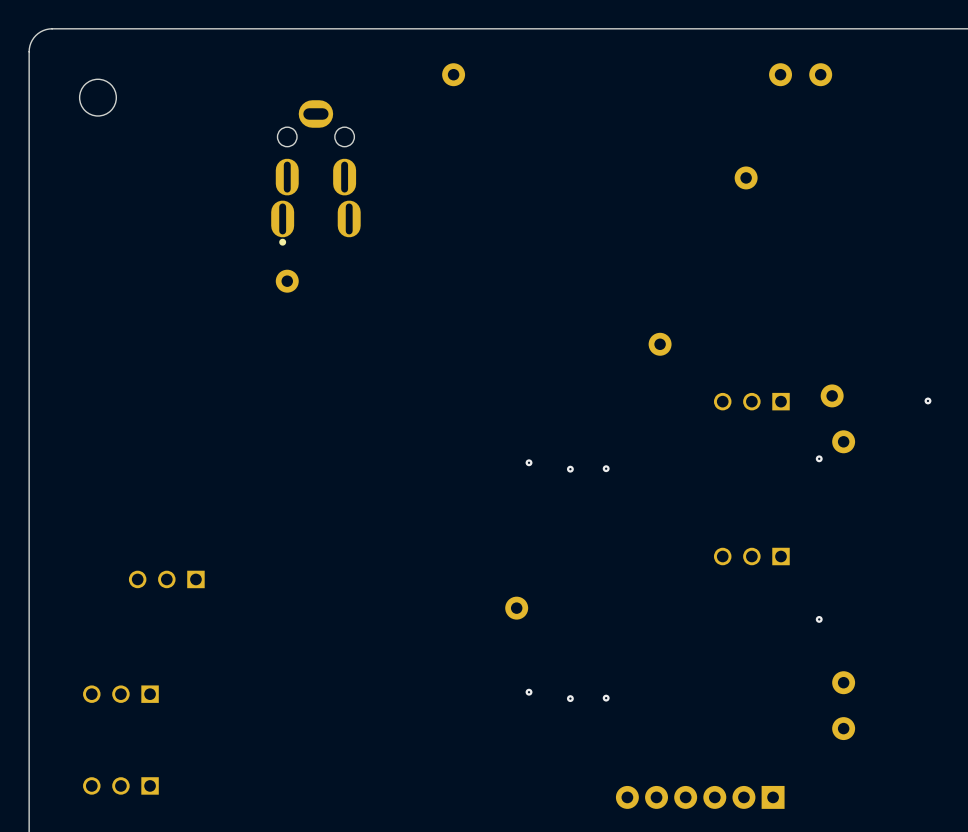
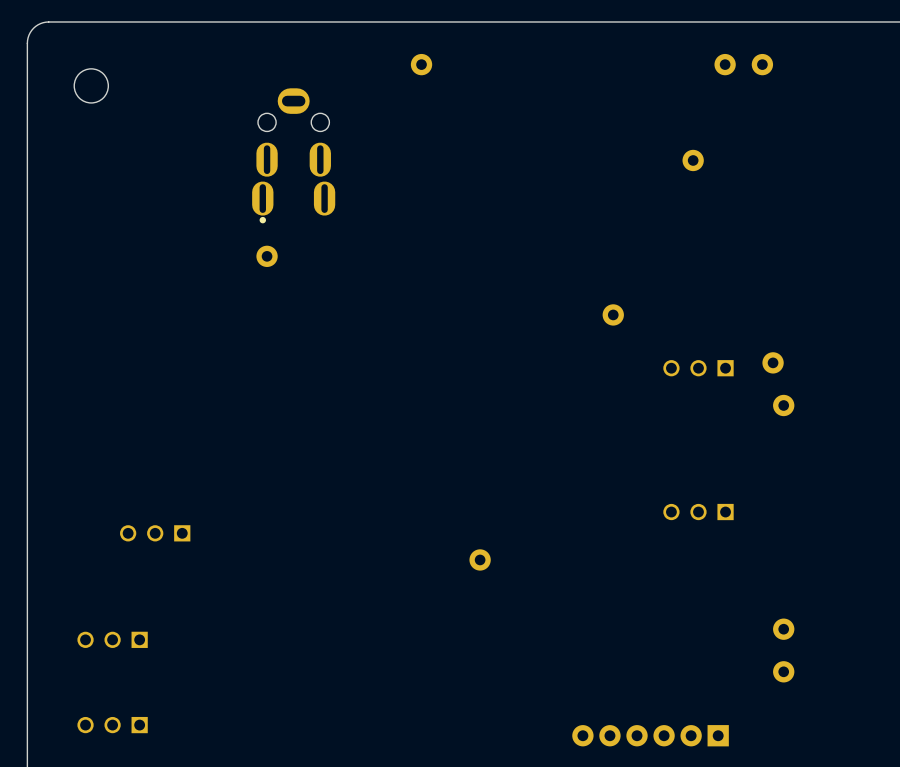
via: (927, 400) -> none
via: (819, 458) -> none
via: (529, 462) -> none
via: (606, 468) -> none
via: (570, 469) -> none
via: (819, 619) -> none
via: (529, 692) -> none
via: (570, 698) -> none
via: (606, 698) -> none

